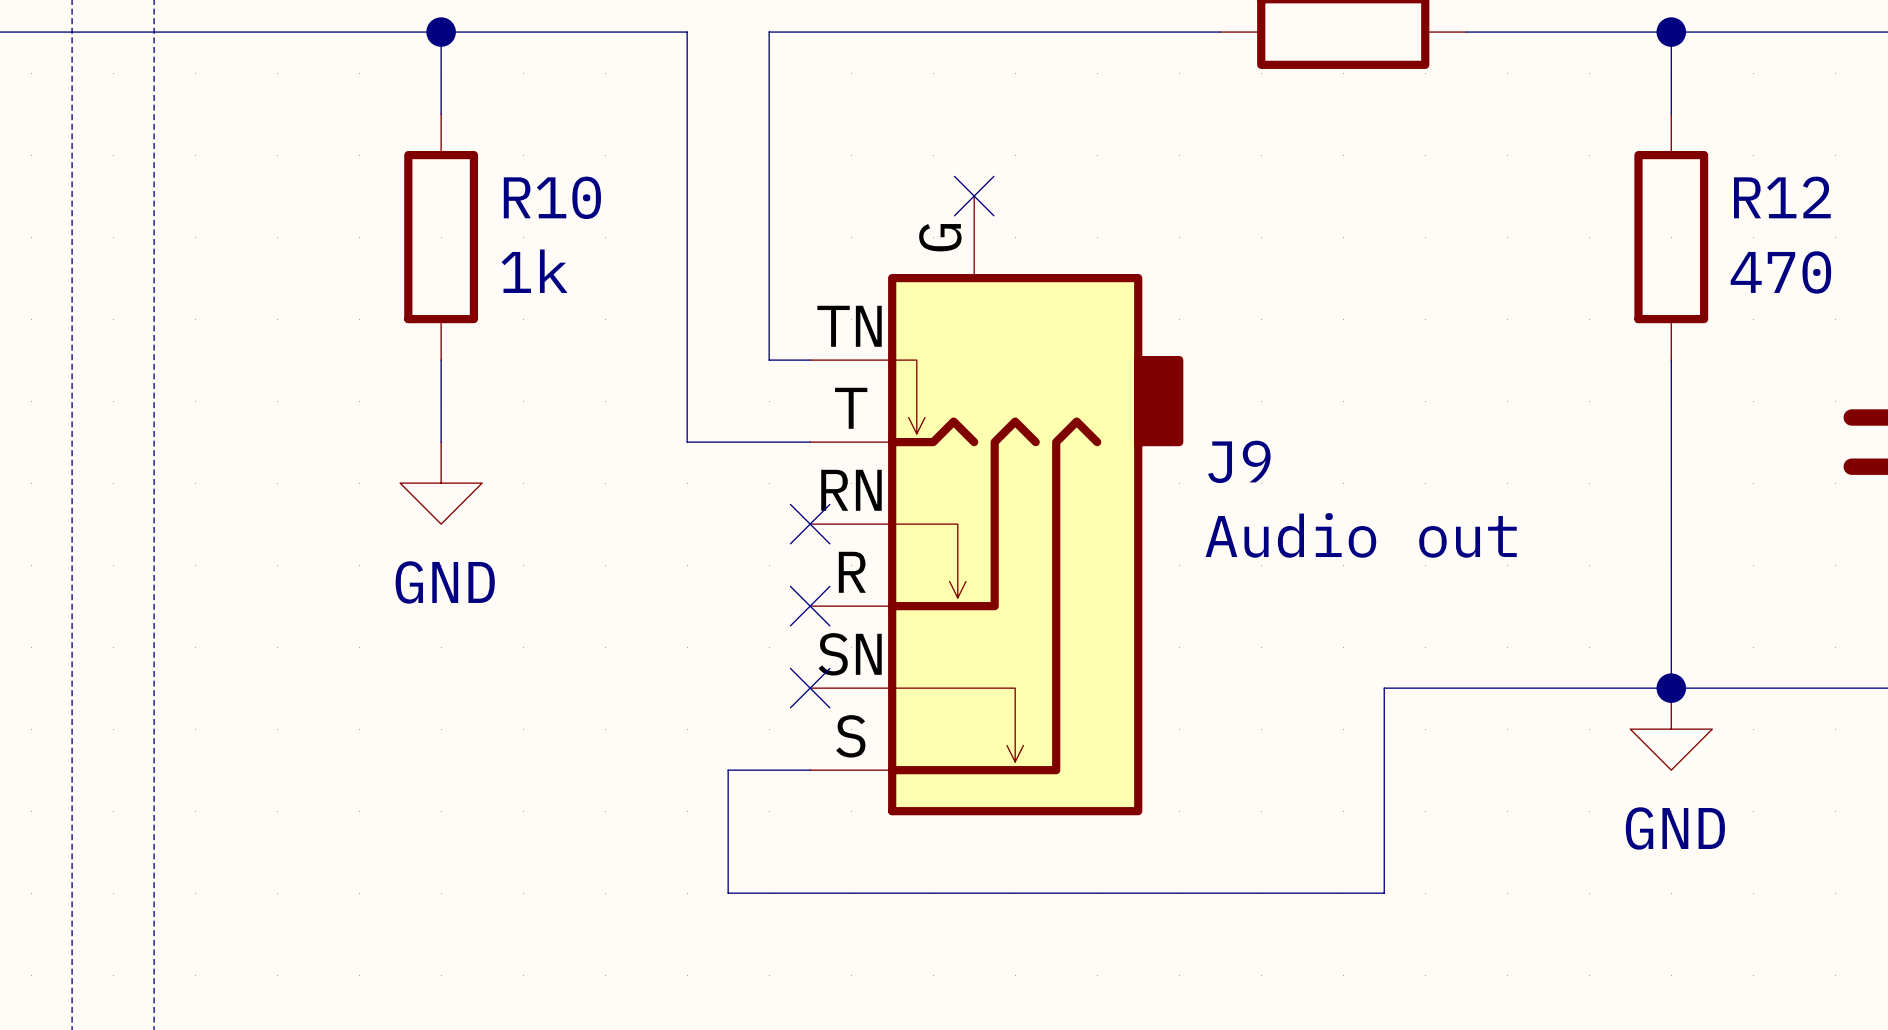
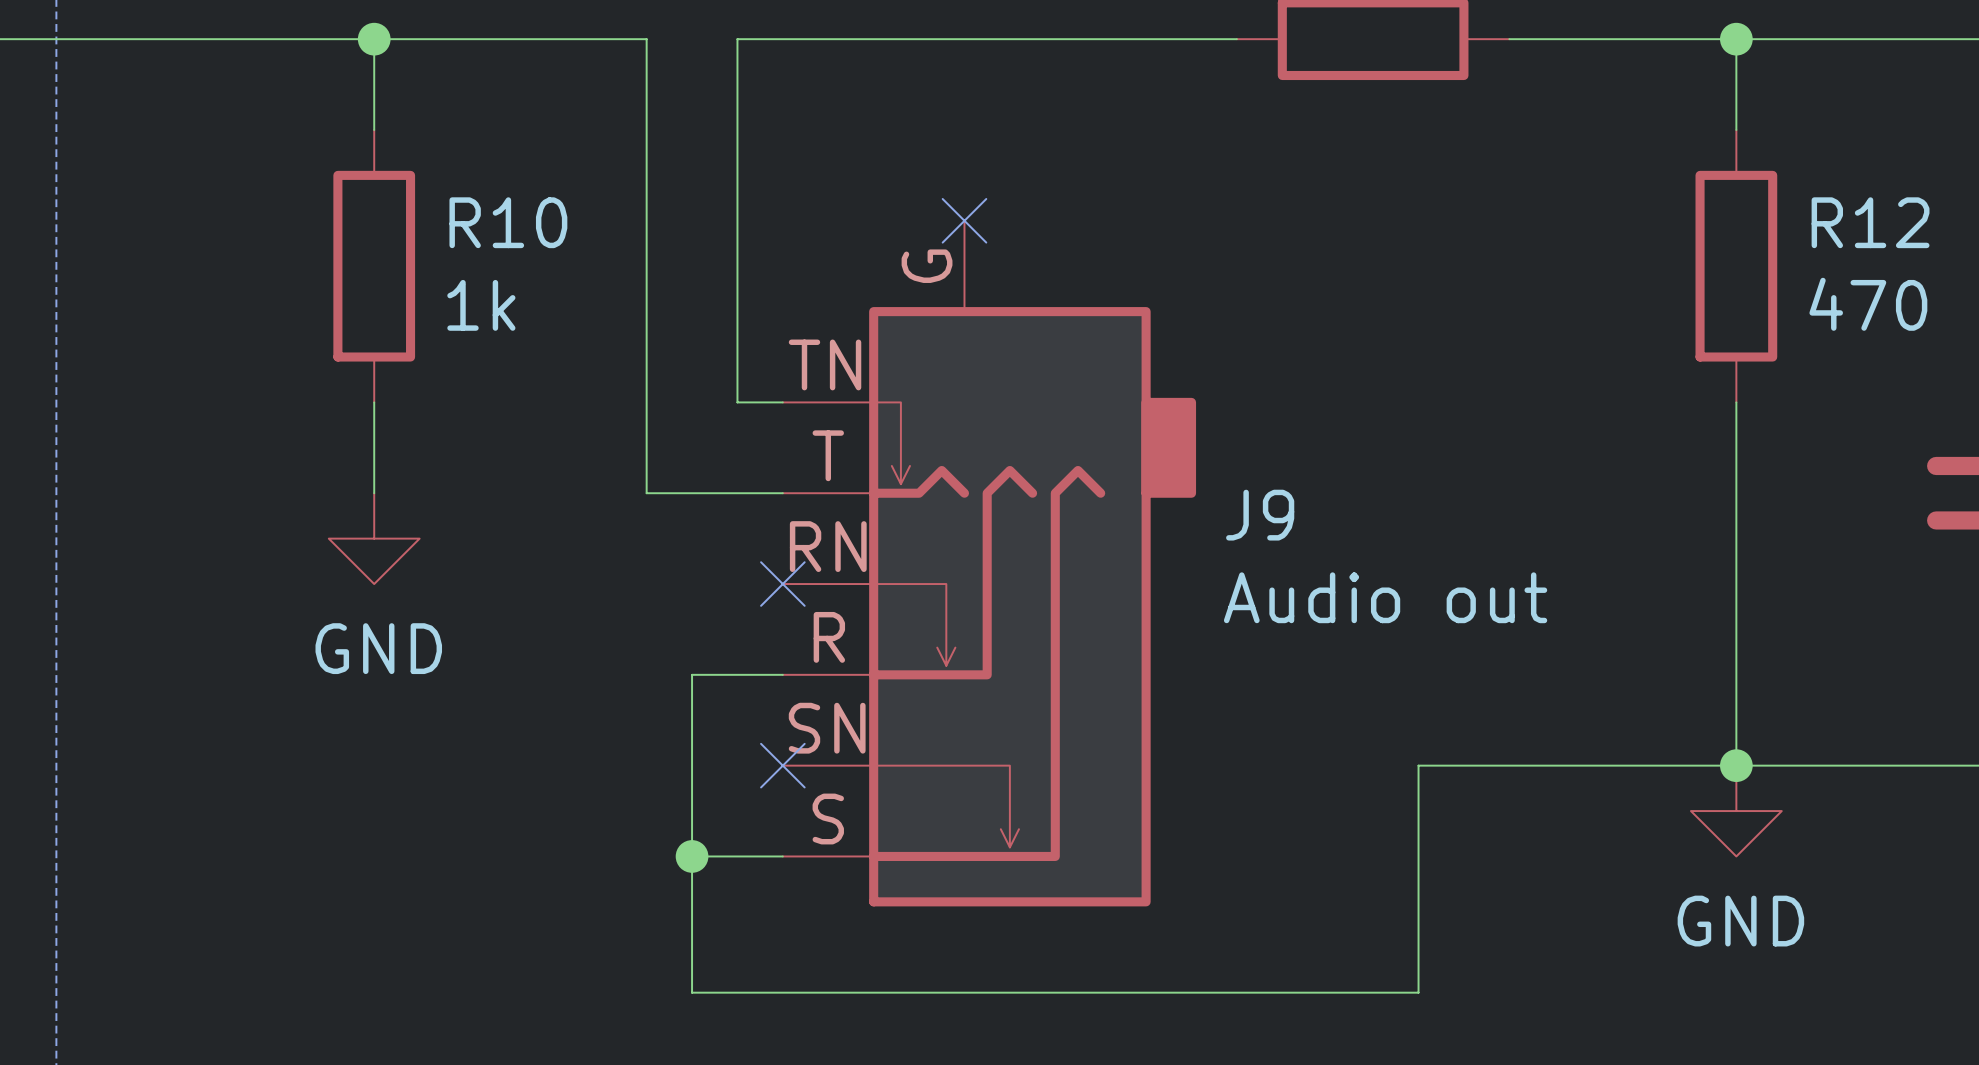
wire: none -> (782, 674) (692, 674) (692, 856)
no-connect mark: (810, 606) -> none
junction: none -> (692, 856)

